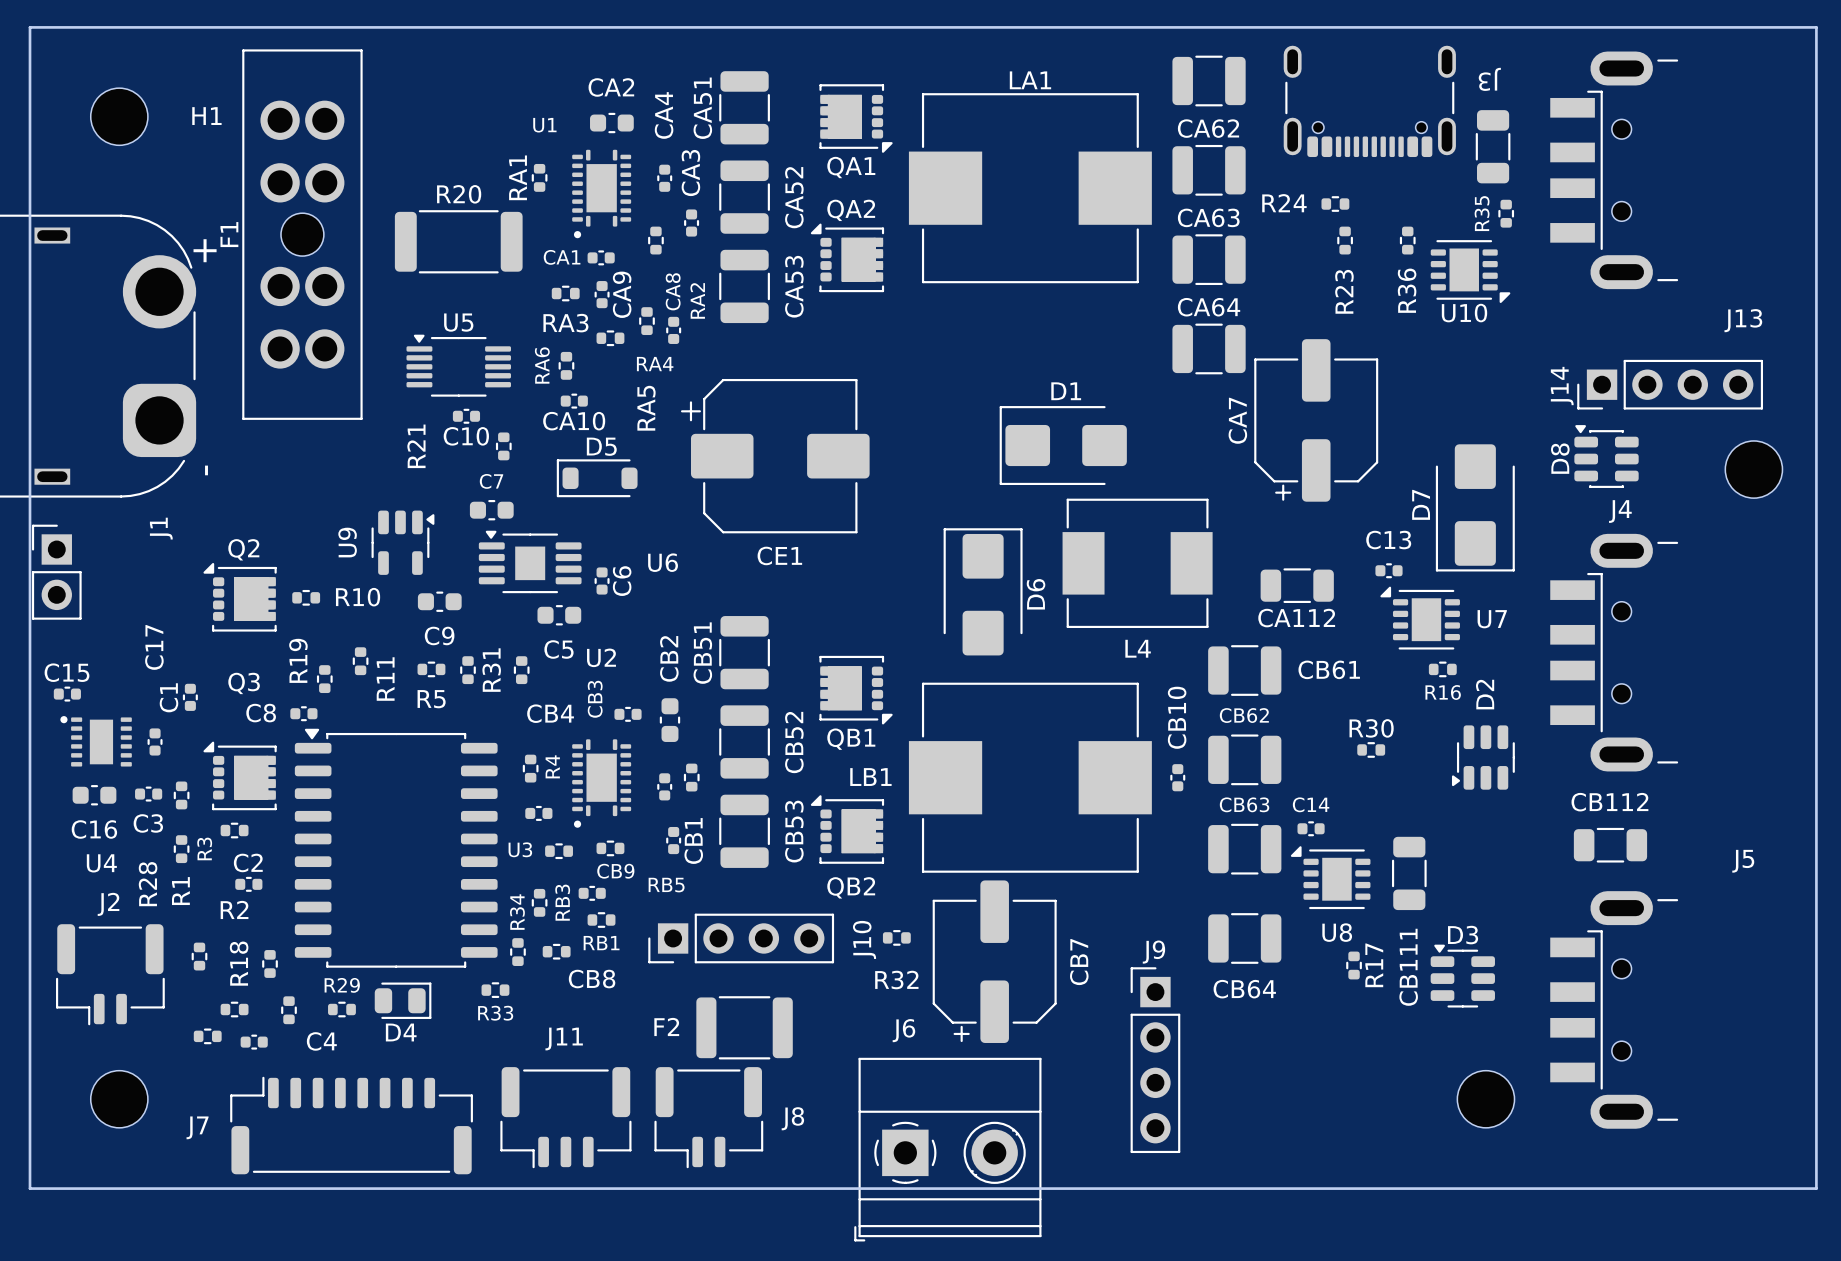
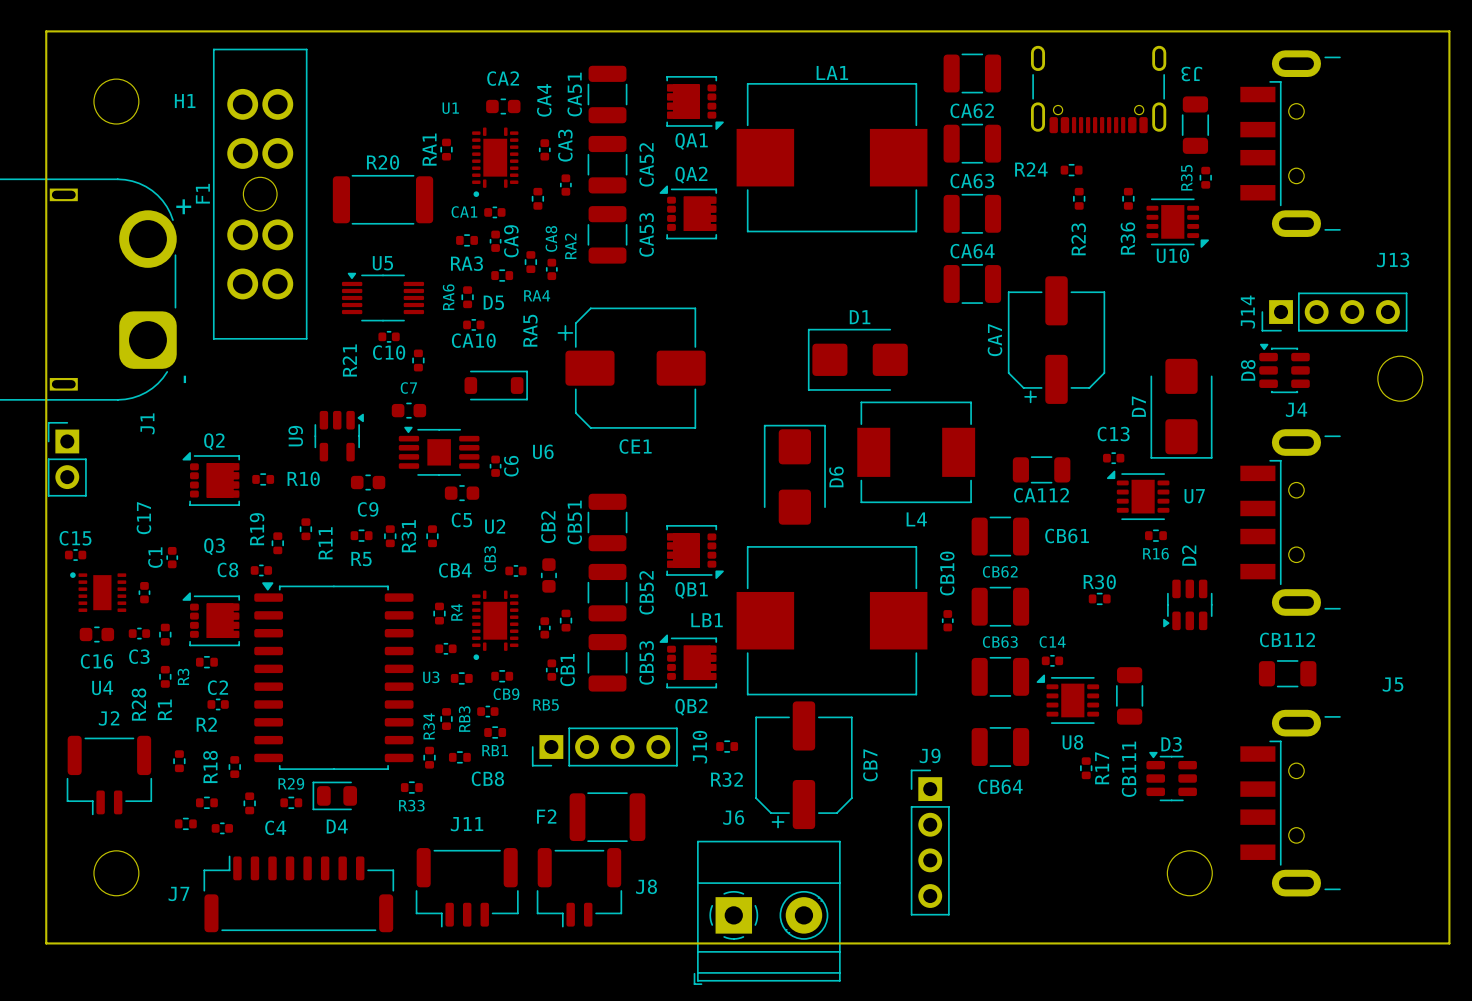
D5 name position: D5 (601, 446) -> D5 (493, 302)
D5 rotation: 0° (597, 478) -> 180° (496, 385)
D4 rotation: 0° (403, 1000) -> 180° (334, 795)

